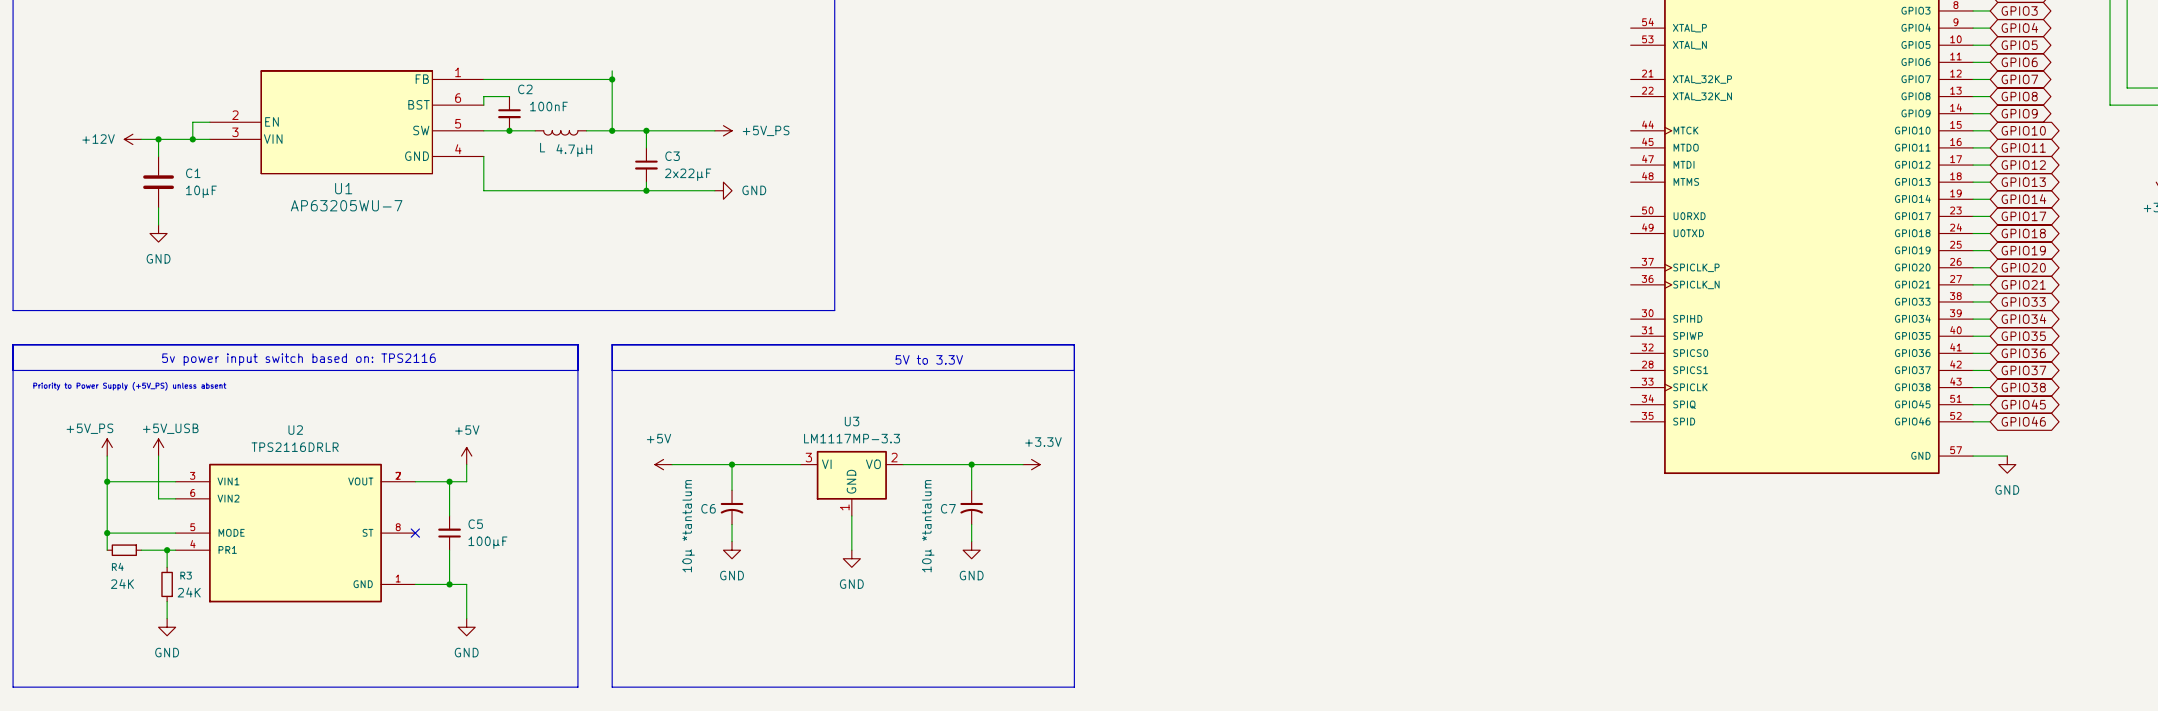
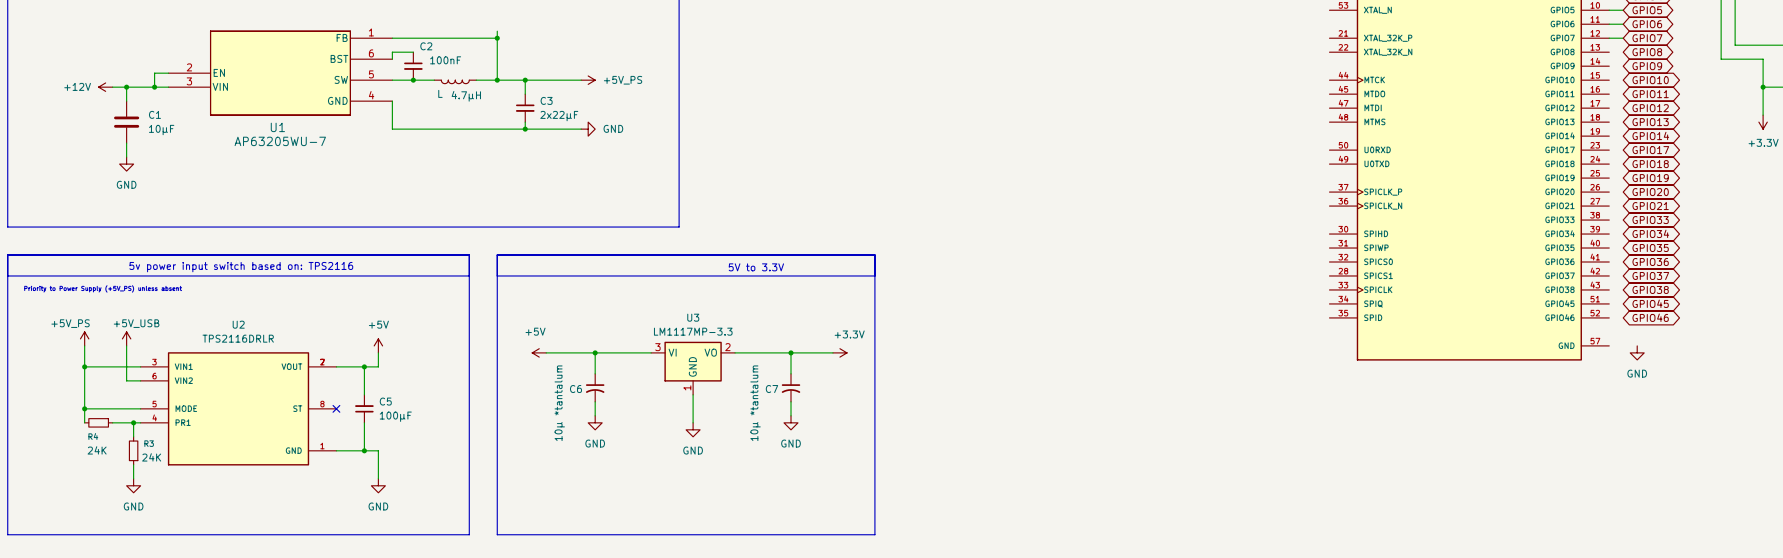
wire: (1973, 96) (1990, 96) -> none
wire: (1973, 113) (1990, 113) -> none
wire: (1973, 130) (1990, 130) -> none
wire: (1973, 147) (1990, 147) -> none
wire: (1973, 165) (1990, 165) -> none
wire: (1973, 182) (1990, 182) -> none
wire: (1973, 199) (1990, 199) -> none
wire: (1973, 216) (1990, 216) -> none
wire: (1973, 233) (1990, 233) -> none
wire: (1973, 250) (1990, 250) -> none
wire: (1973, 267) (1990, 267) -> none
wire: (1973, 284) (1990, 284) -> none
wire: (1973, 301) (1990, 301) -> none
wire: (1973, 319) (1990, 319) -> none
wire: (1973, 336) (1990, 336) -> none
wire: (1973, 353) (1990, 353) -> none
wire: (1973, 370) (1990, 370) -> none
wire: (1973, 387) (1990, 387) -> none
wire: (1973, 404) (1990, 404) -> none
wire: (1973, 421) (1990, 421) -> none
wire: (1973, 456) (2007, 456) -> none

